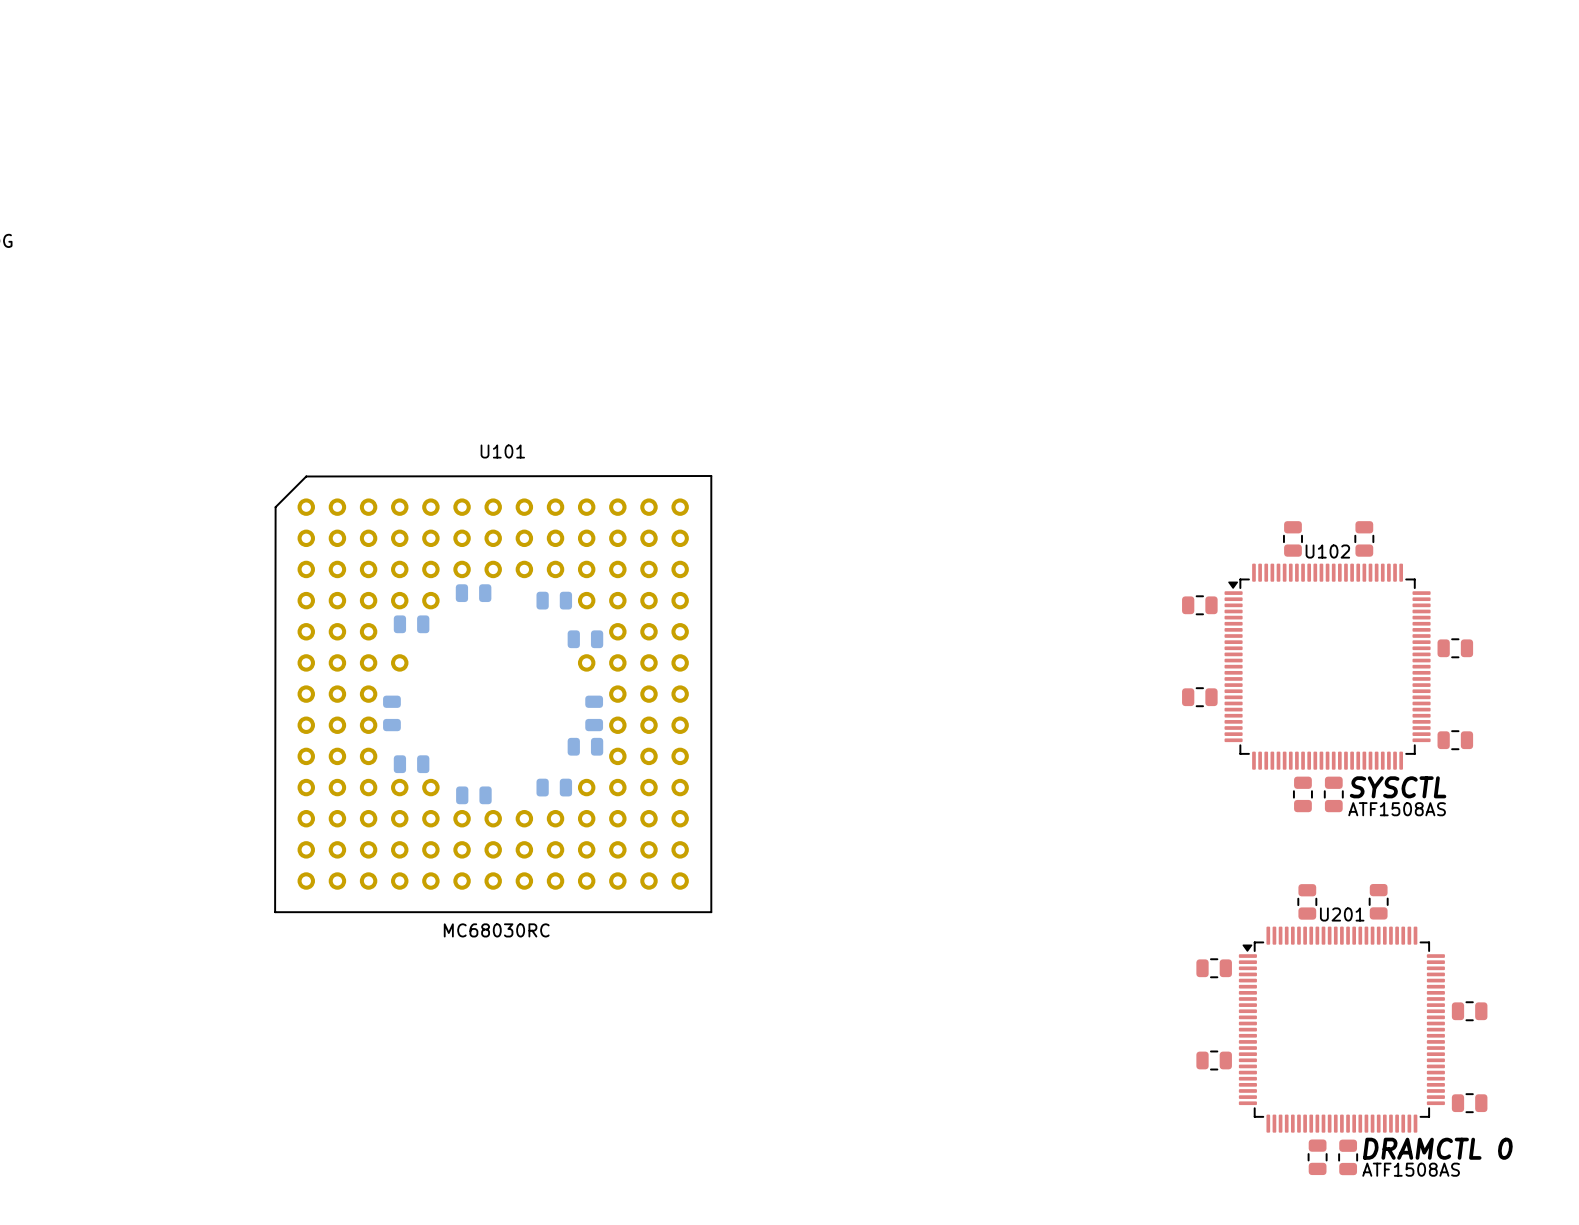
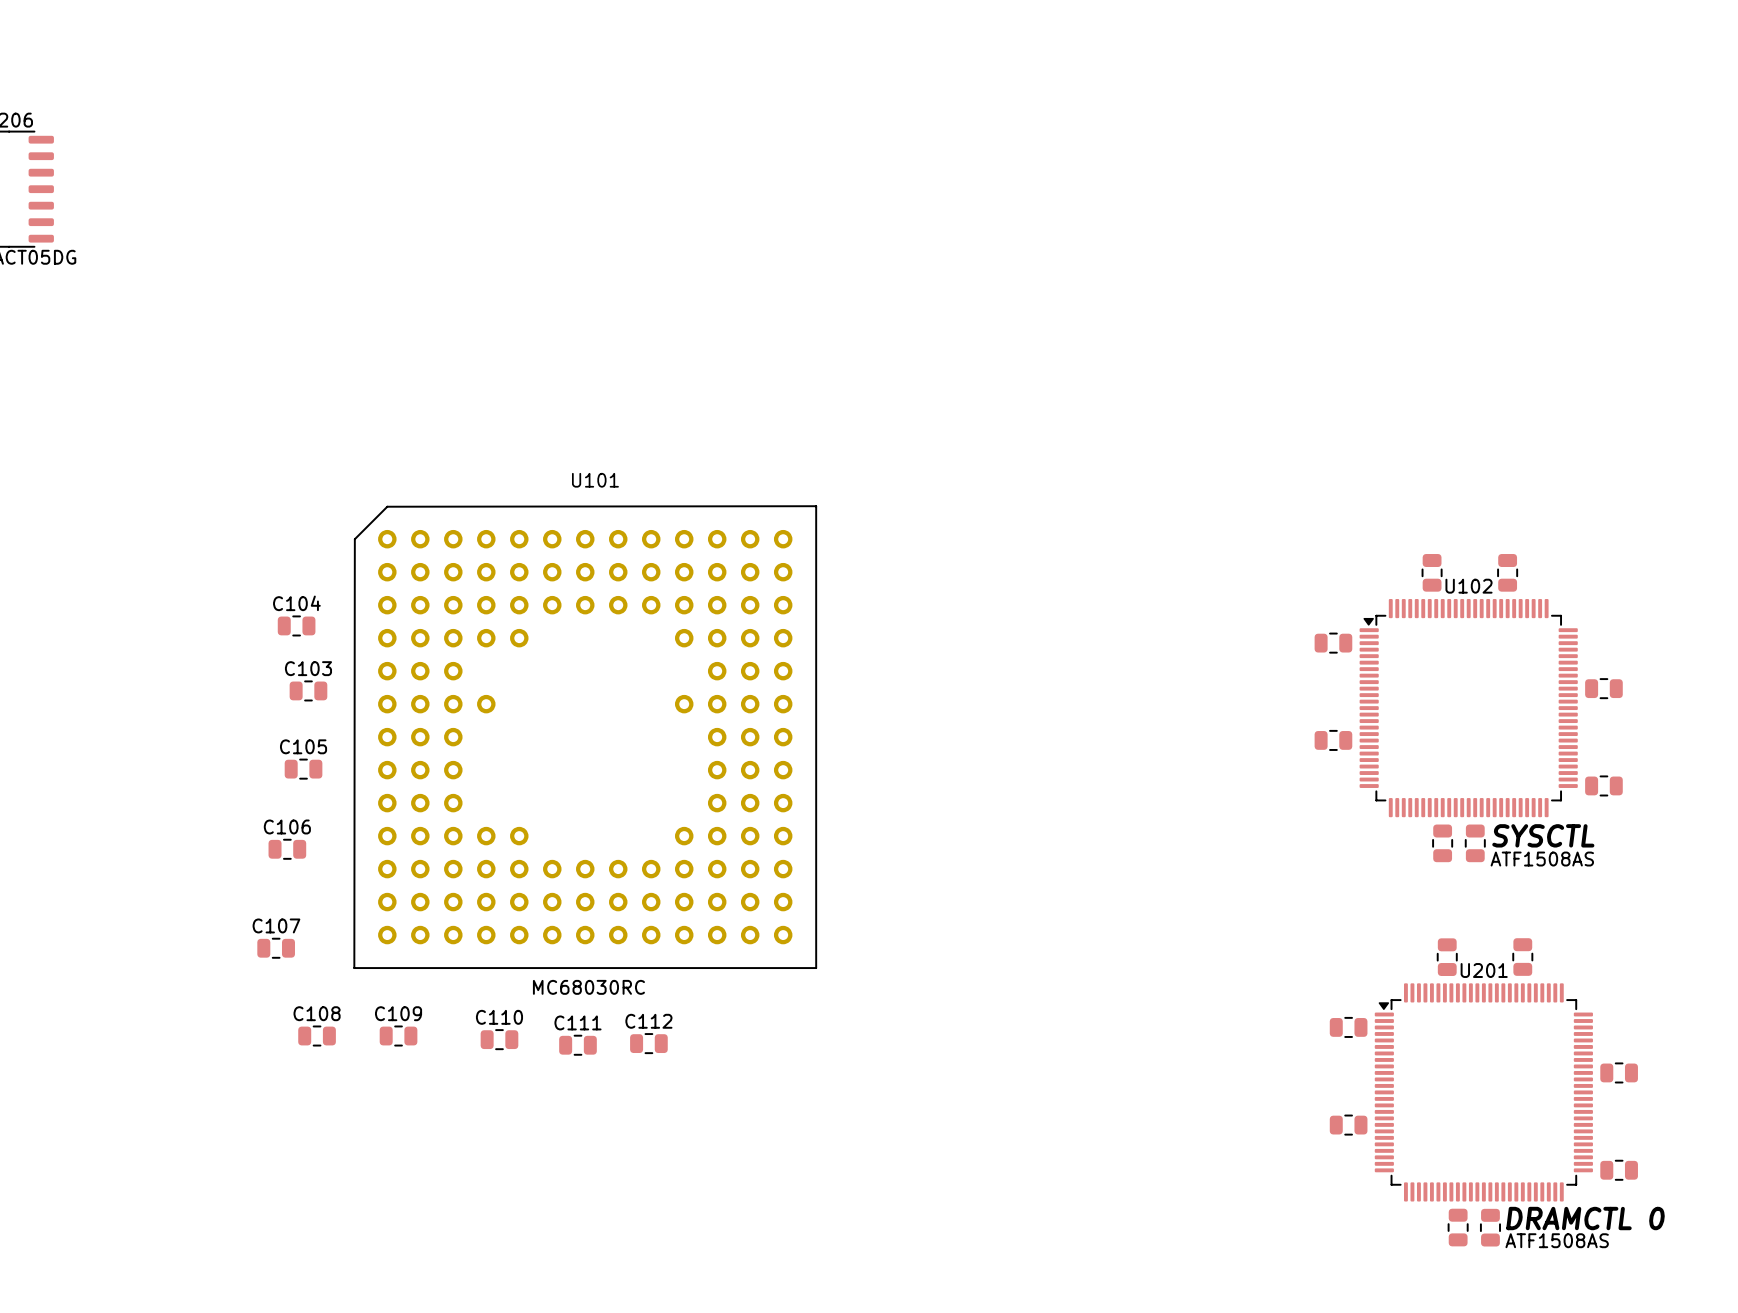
C104 side: bottom (473, 593) -> top (296, 625)
part: (554, 600) -> none
C103 side: bottom (411, 624) -> top (308, 690)
part: (585, 639) -> none
C105 side: bottom (391, 713) -> top (303, 769)
part: (594, 713) -> none
C110 side: bottom (585, 746) -> top (499, 1039)
C106 side: bottom (411, 764) -> top (287, 849)
part: (554, 787) -> none
C107 side: bottom (473, 795) -> top (276, 948)
C108: none -> (317, 1036)
C109: none -> (398, 1036)
C112: none -> (648, 1043)
C111: none -> (577, 1045)

